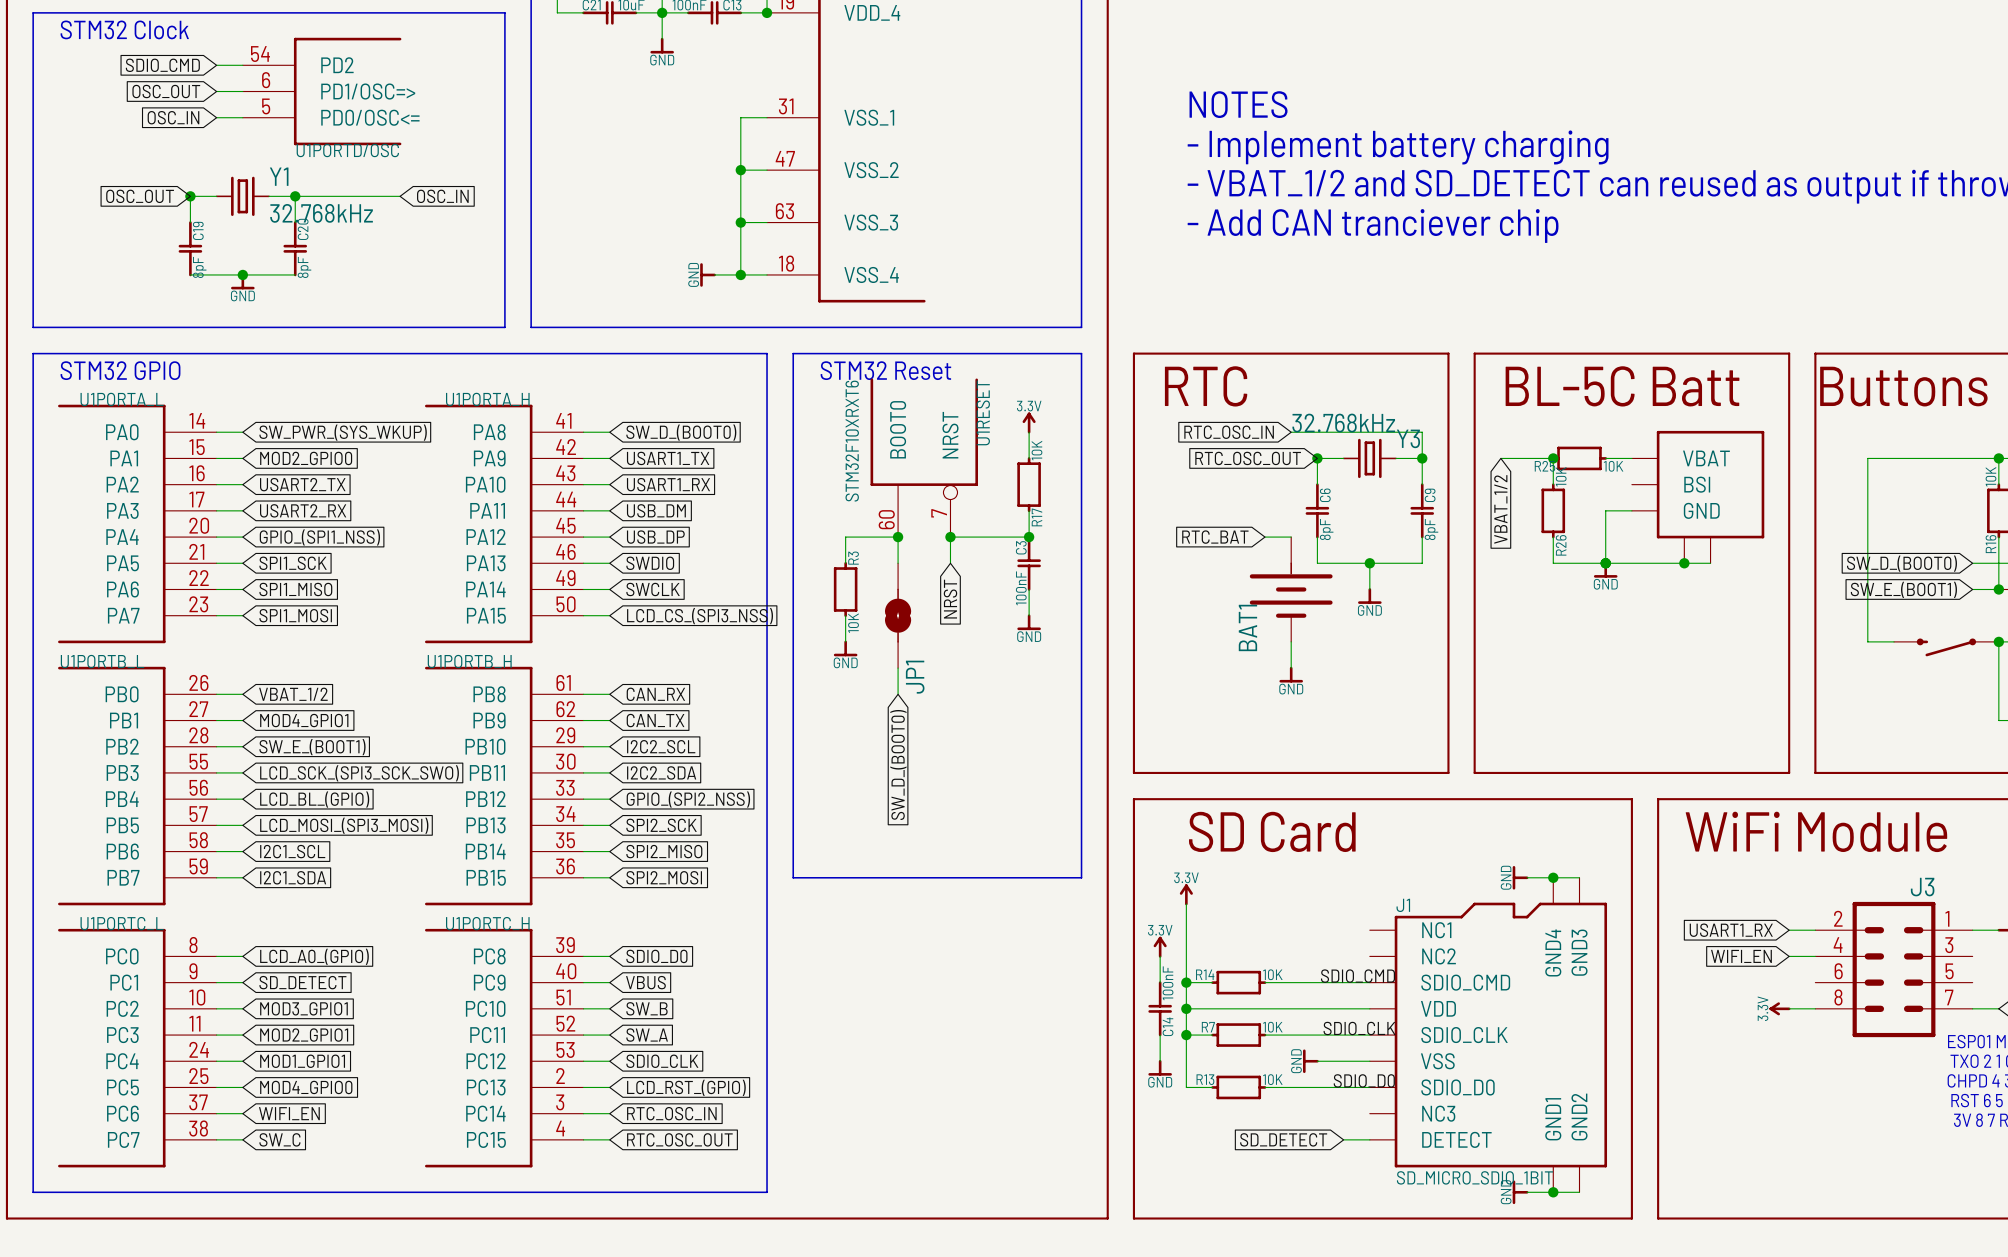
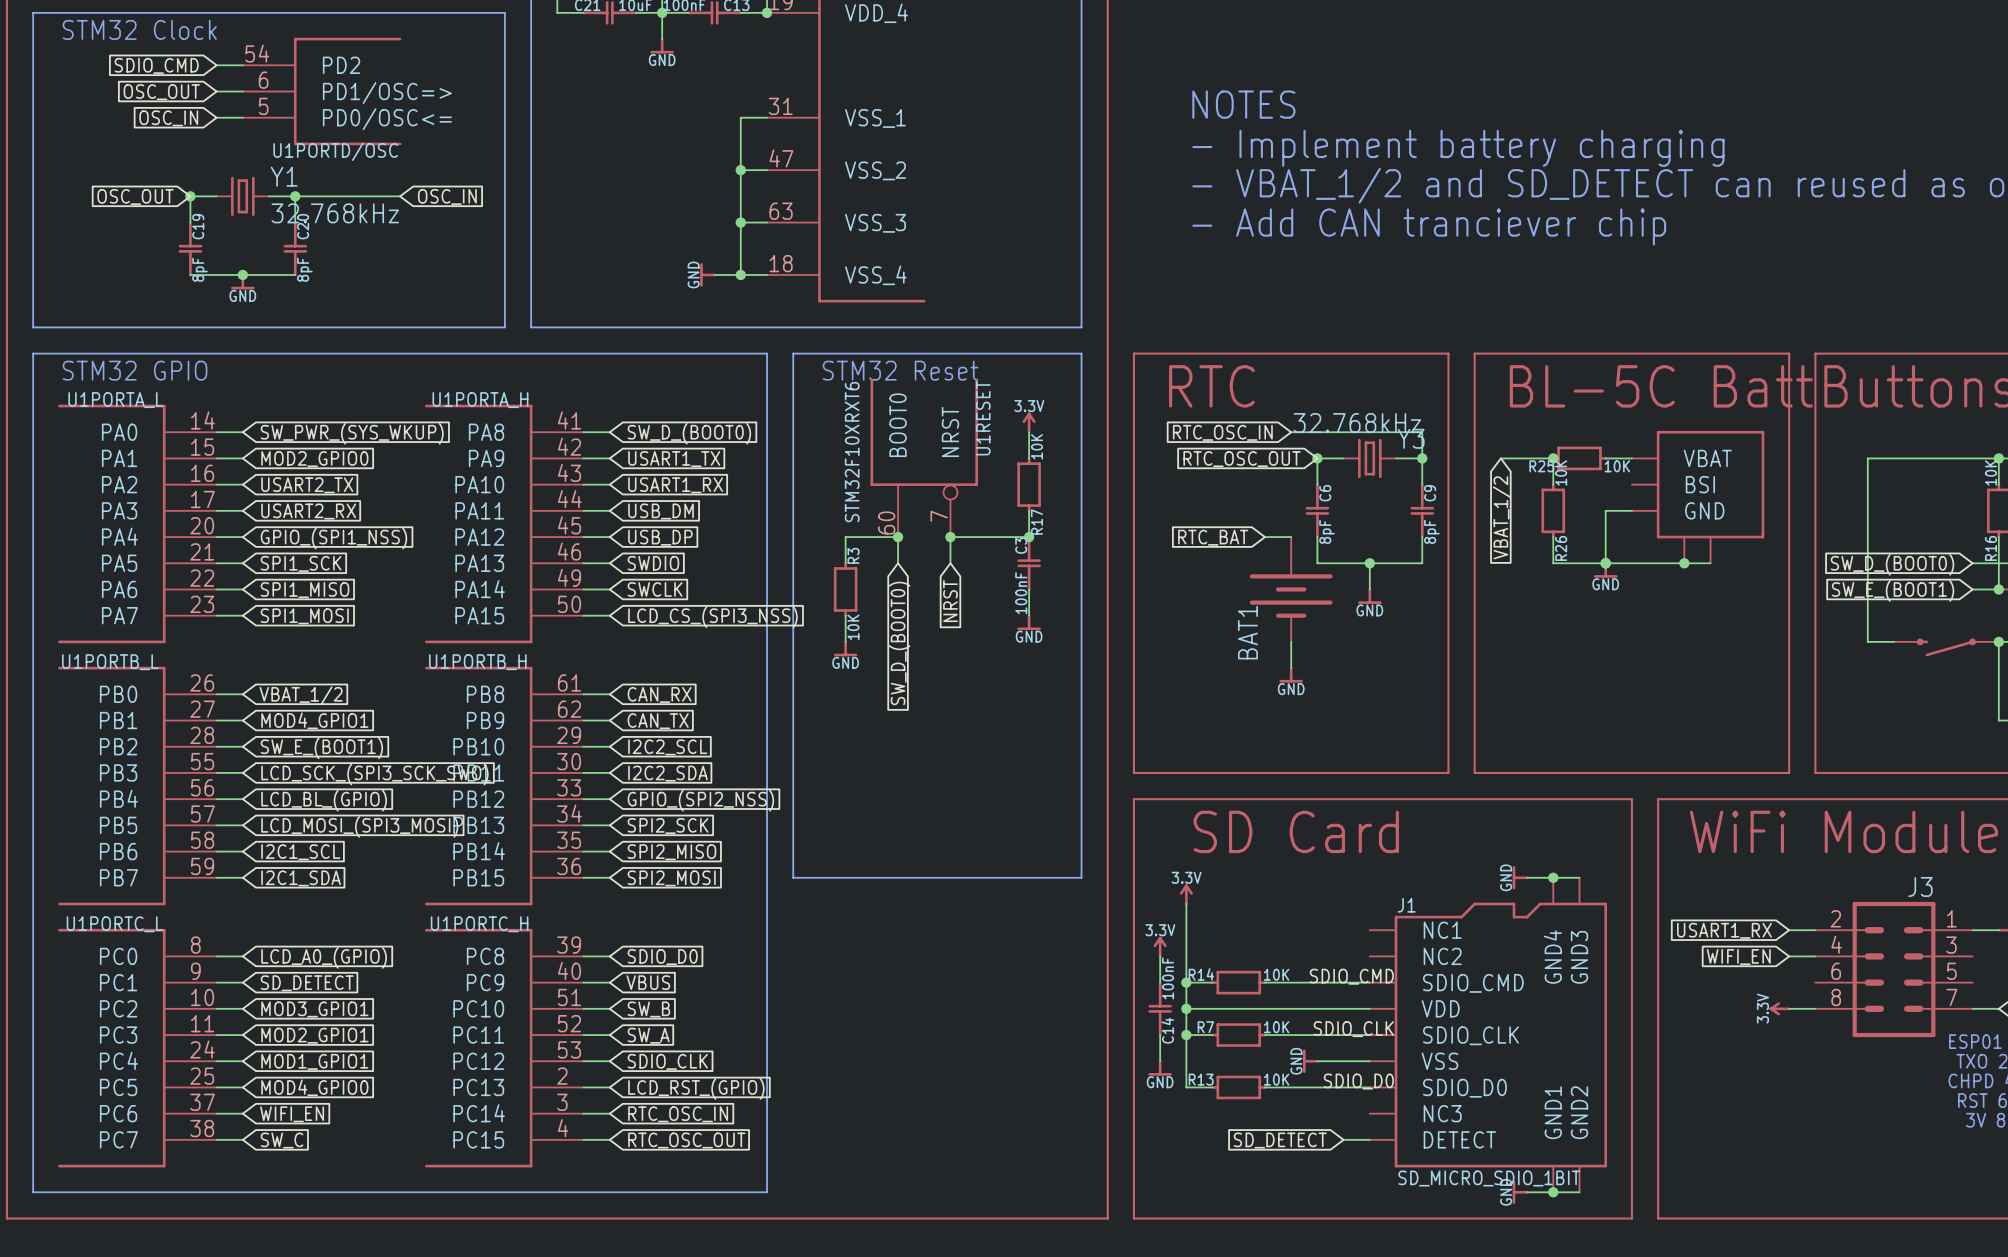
JP1: (898, 615) -> none
wire: (898, 668) (898, 694) -> none
global label position: SW_D_(BOOT0) (898, 764) -> SW_D_(BOOT0) (899, 643)

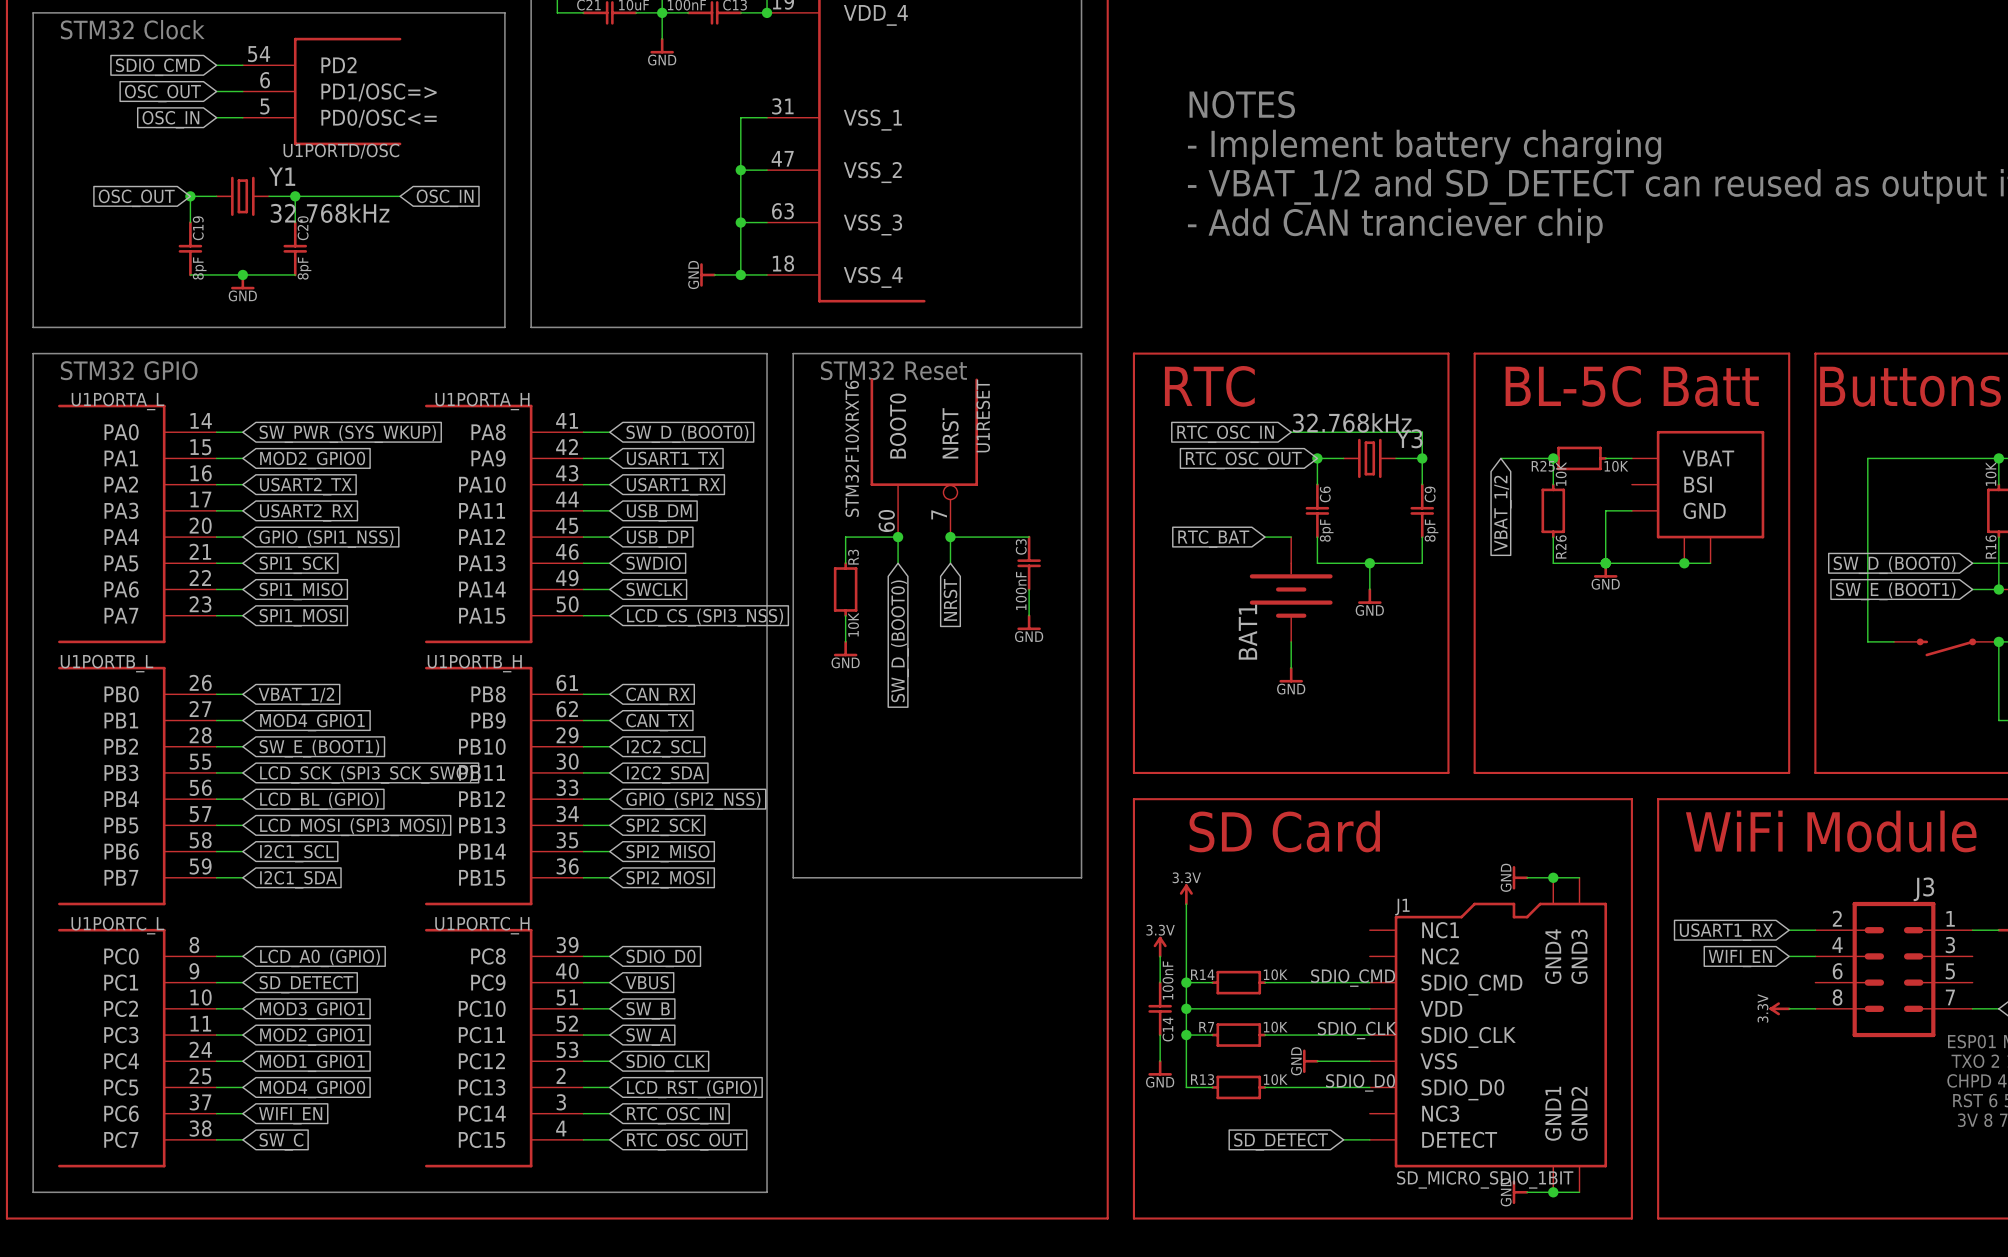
power symbol: 3.3V (1029, 423) -> none
wire: (1029, 432) (1029, 458) -> none
R17: 10K (1029, 484) -> none
wire: (1029, 510) (1029, 537) -> none
junction: (1029, 537) -> none

